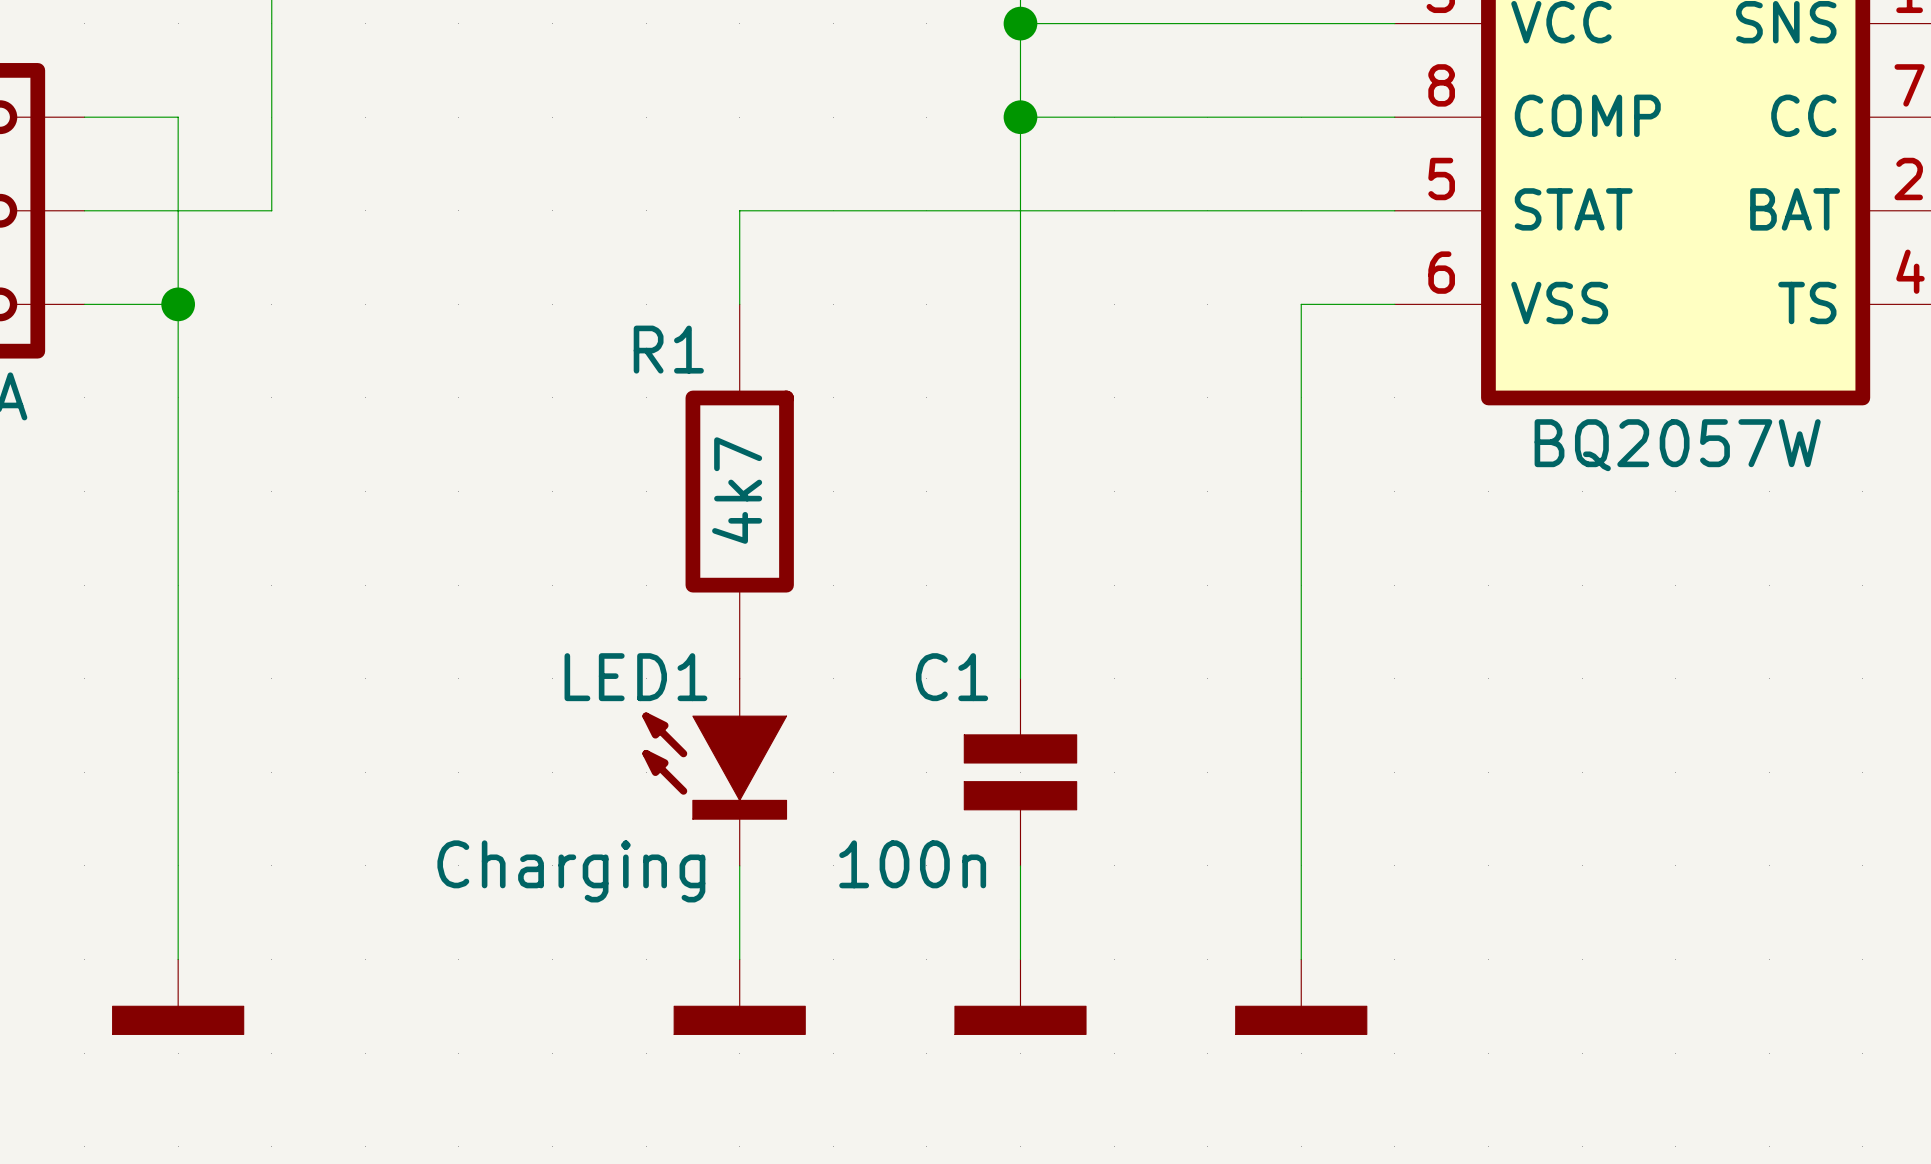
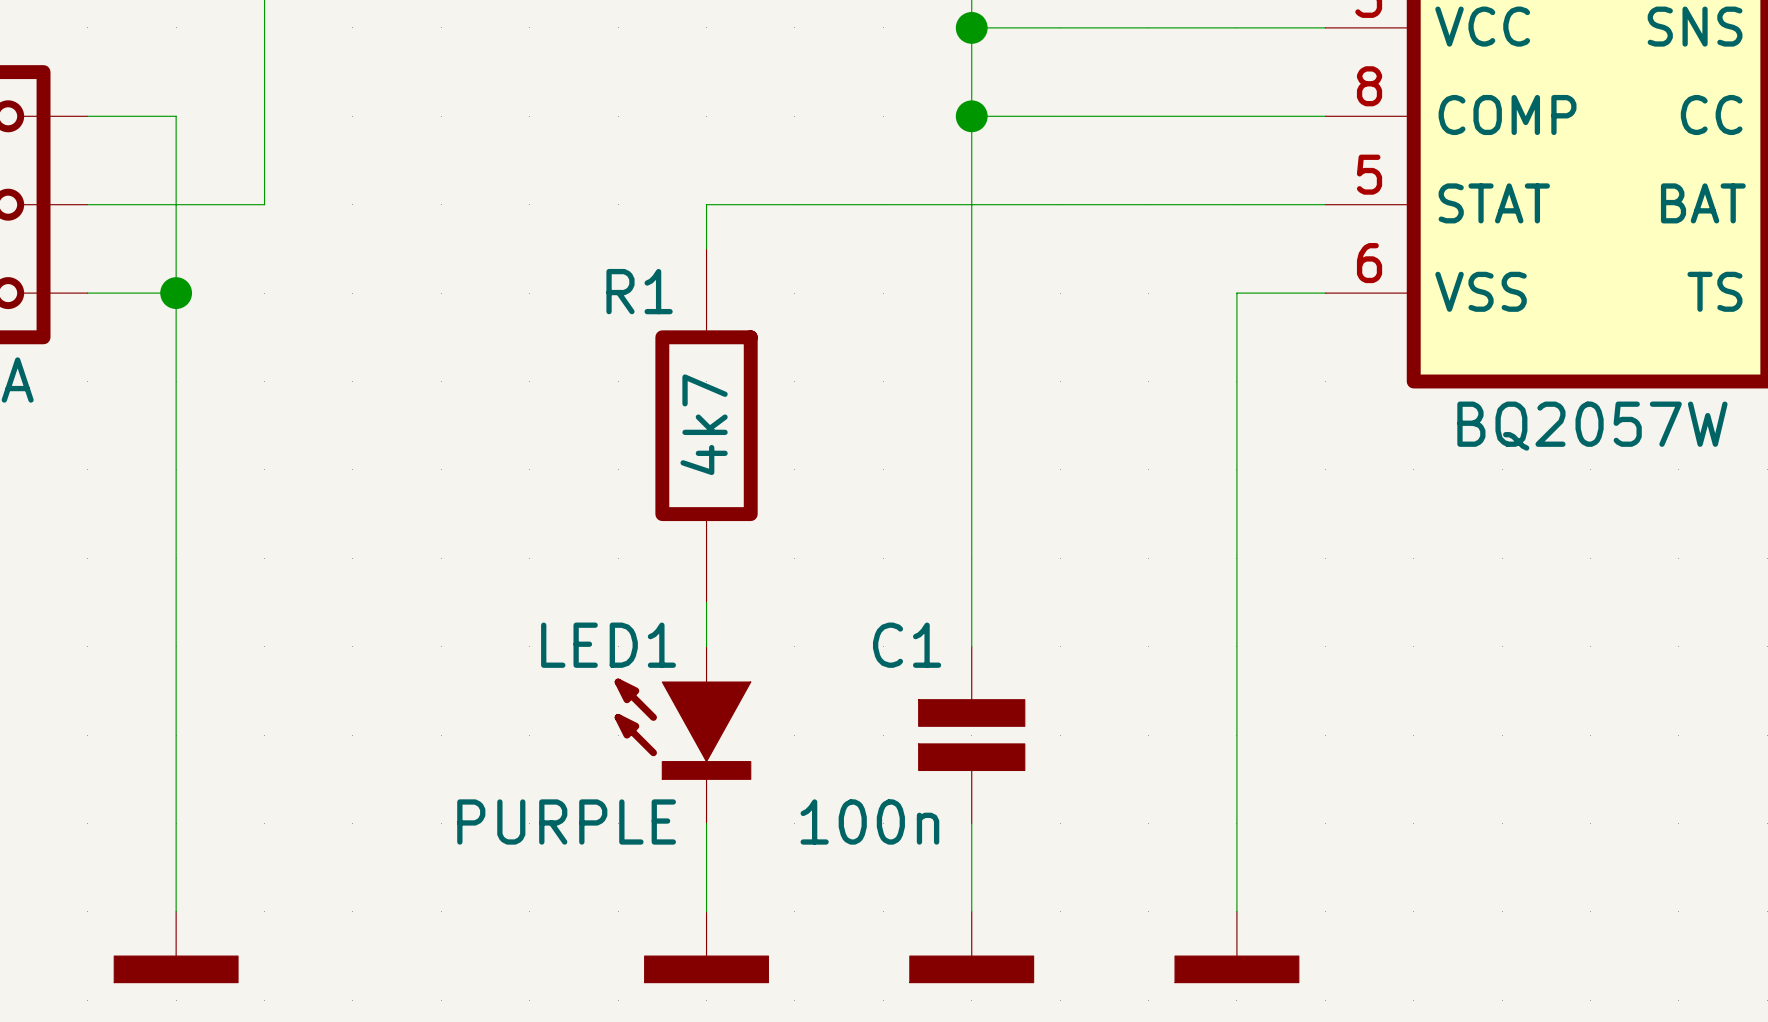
R1 position: (739, 491) -> (706, 425)
LED1 value: Charging (571, 871) -> PURPLE (566, 822)

